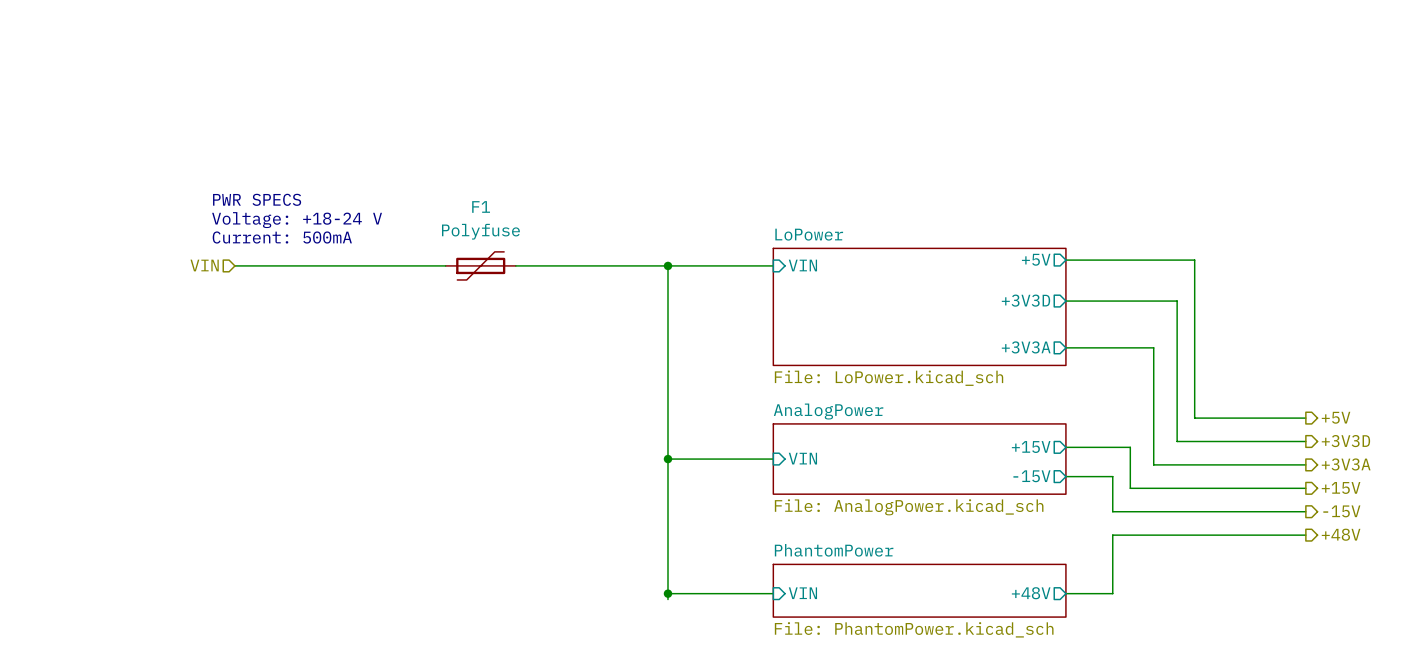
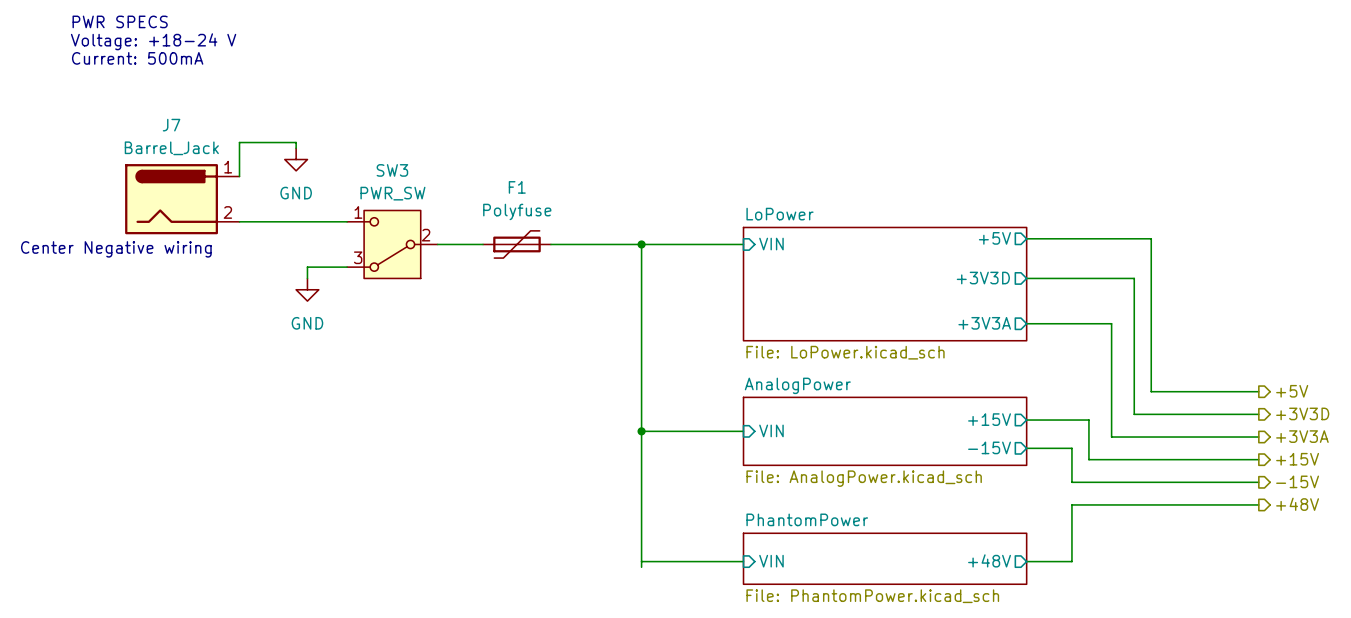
wire: none -> (296, 148) (296, 142) (239, 142) (239, 176)
power symbol: none -> GND (296, 159)
text position: PWR SPECS (257, 199) -> PWR SPECS (120, 21)
J7: none -> Barrel_Jack (182, 199)
text position: Voltage: +18-24 V (297, 220) -> Voltage: +18-24 V (153, 41)
text position: Current: 500mA (282, 237) -> Current: 500mA (137, 58)
wire: none -> (239, 221) (347, 221)
hierarchical label: VIN (204, 265) -> none
wire: (234, 265) (445, 265) -> none
SW3: none -> PWR_SW (392, 244)
F1 position: (480, 265) -> (516, 244)
text: none -> Center Negative wiring (116, 249)
wire: none -> (347, 267) (307, 267) (307, 278)
power symbol: none -> GND (307, 289)
junction: (667, 593) -> none

